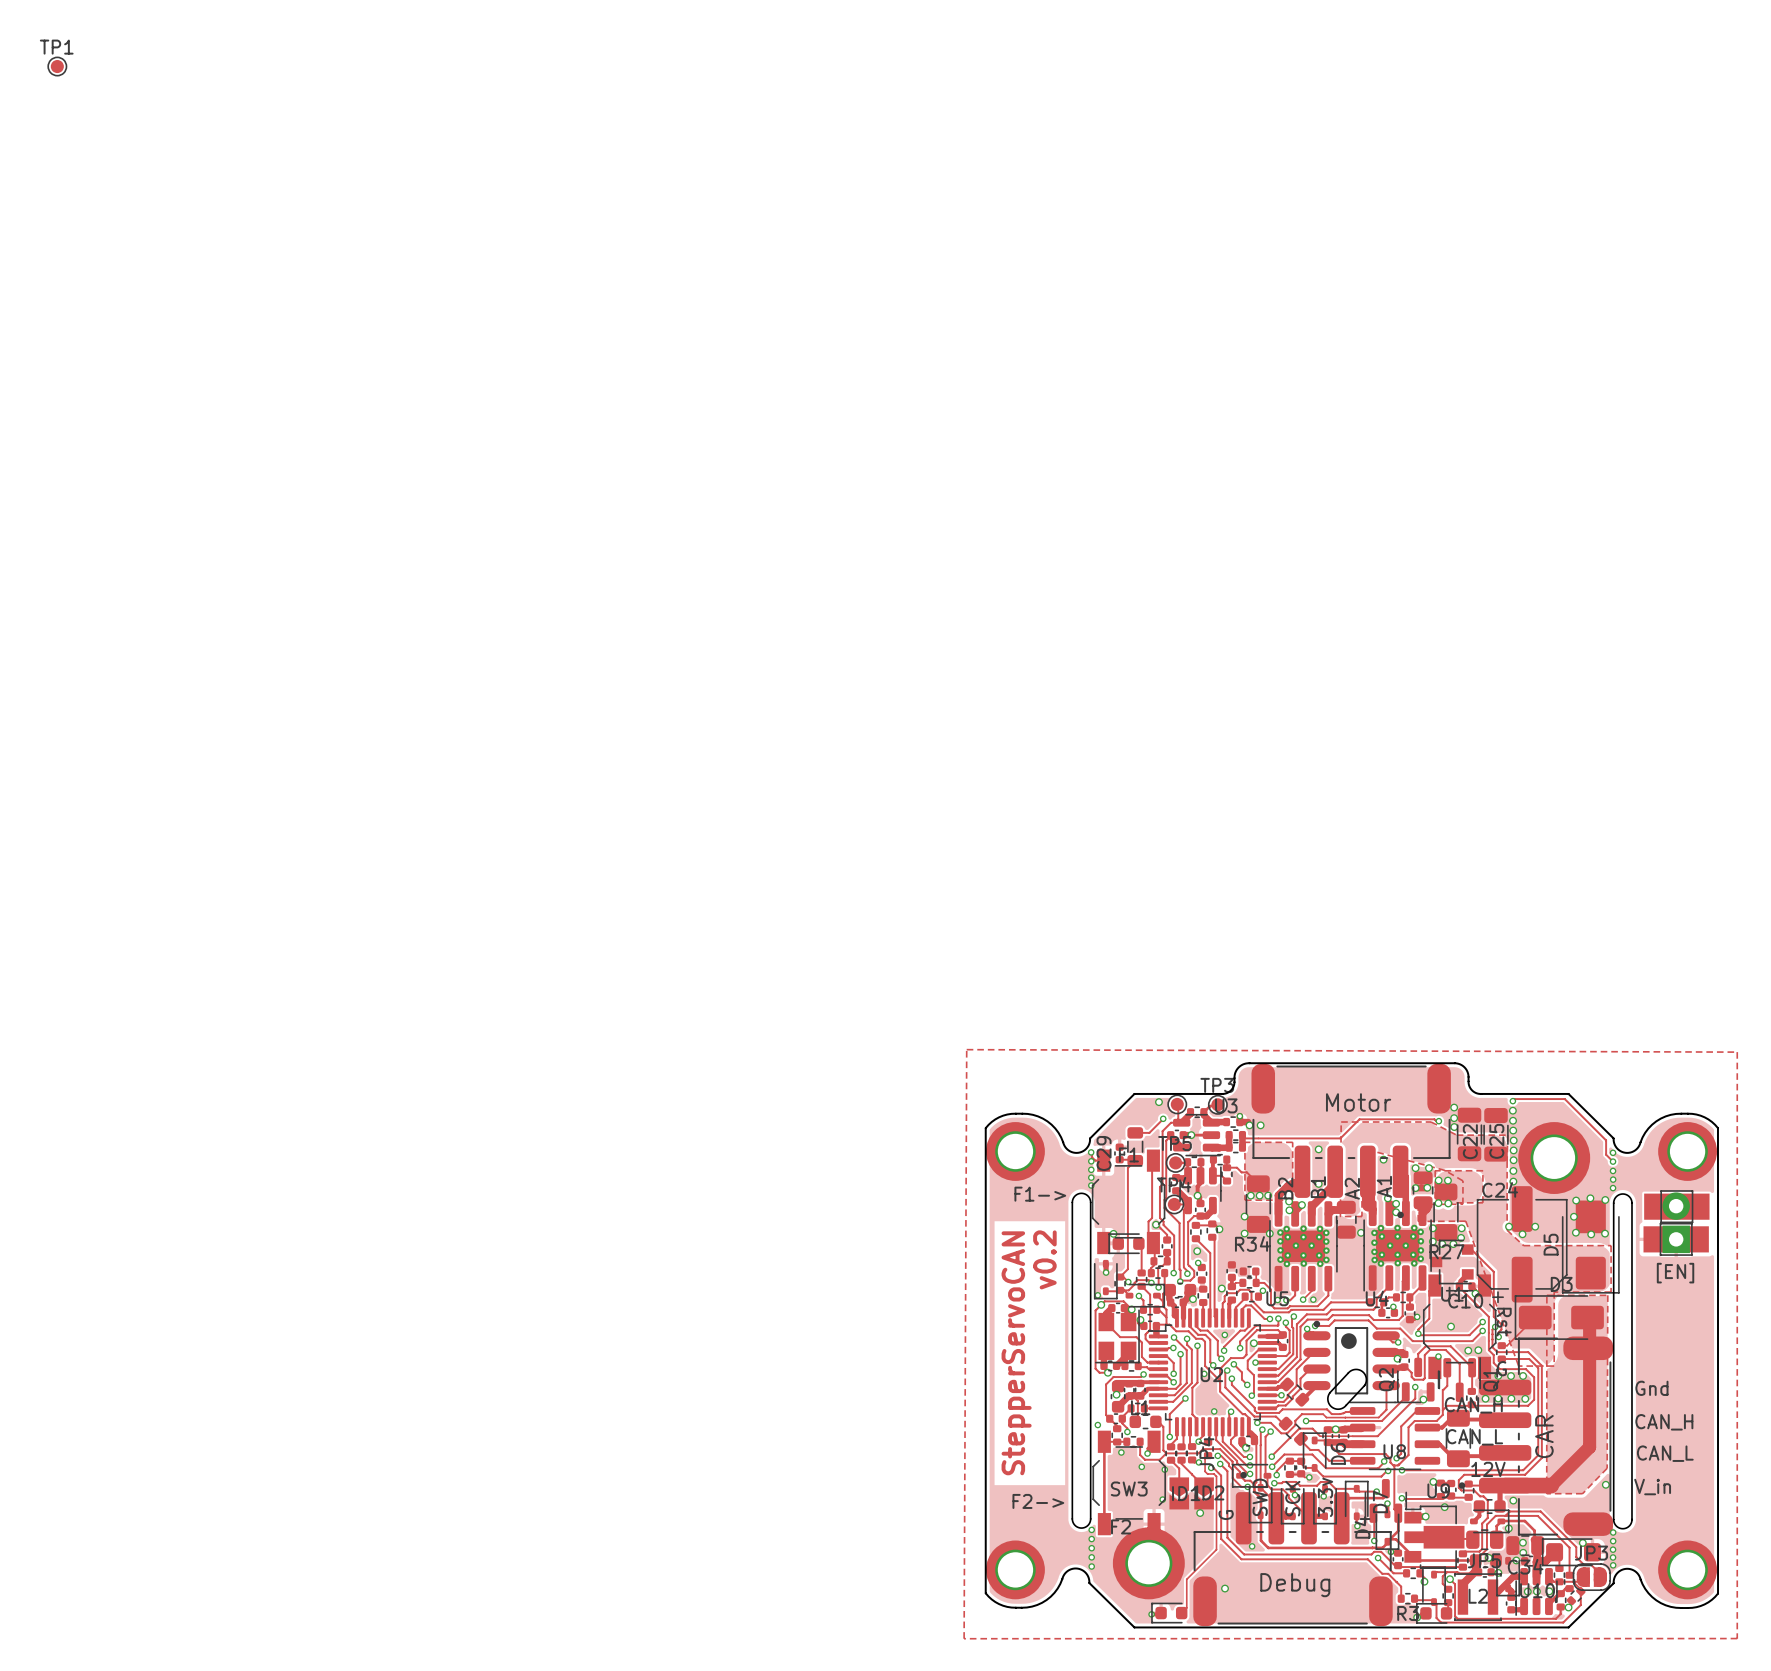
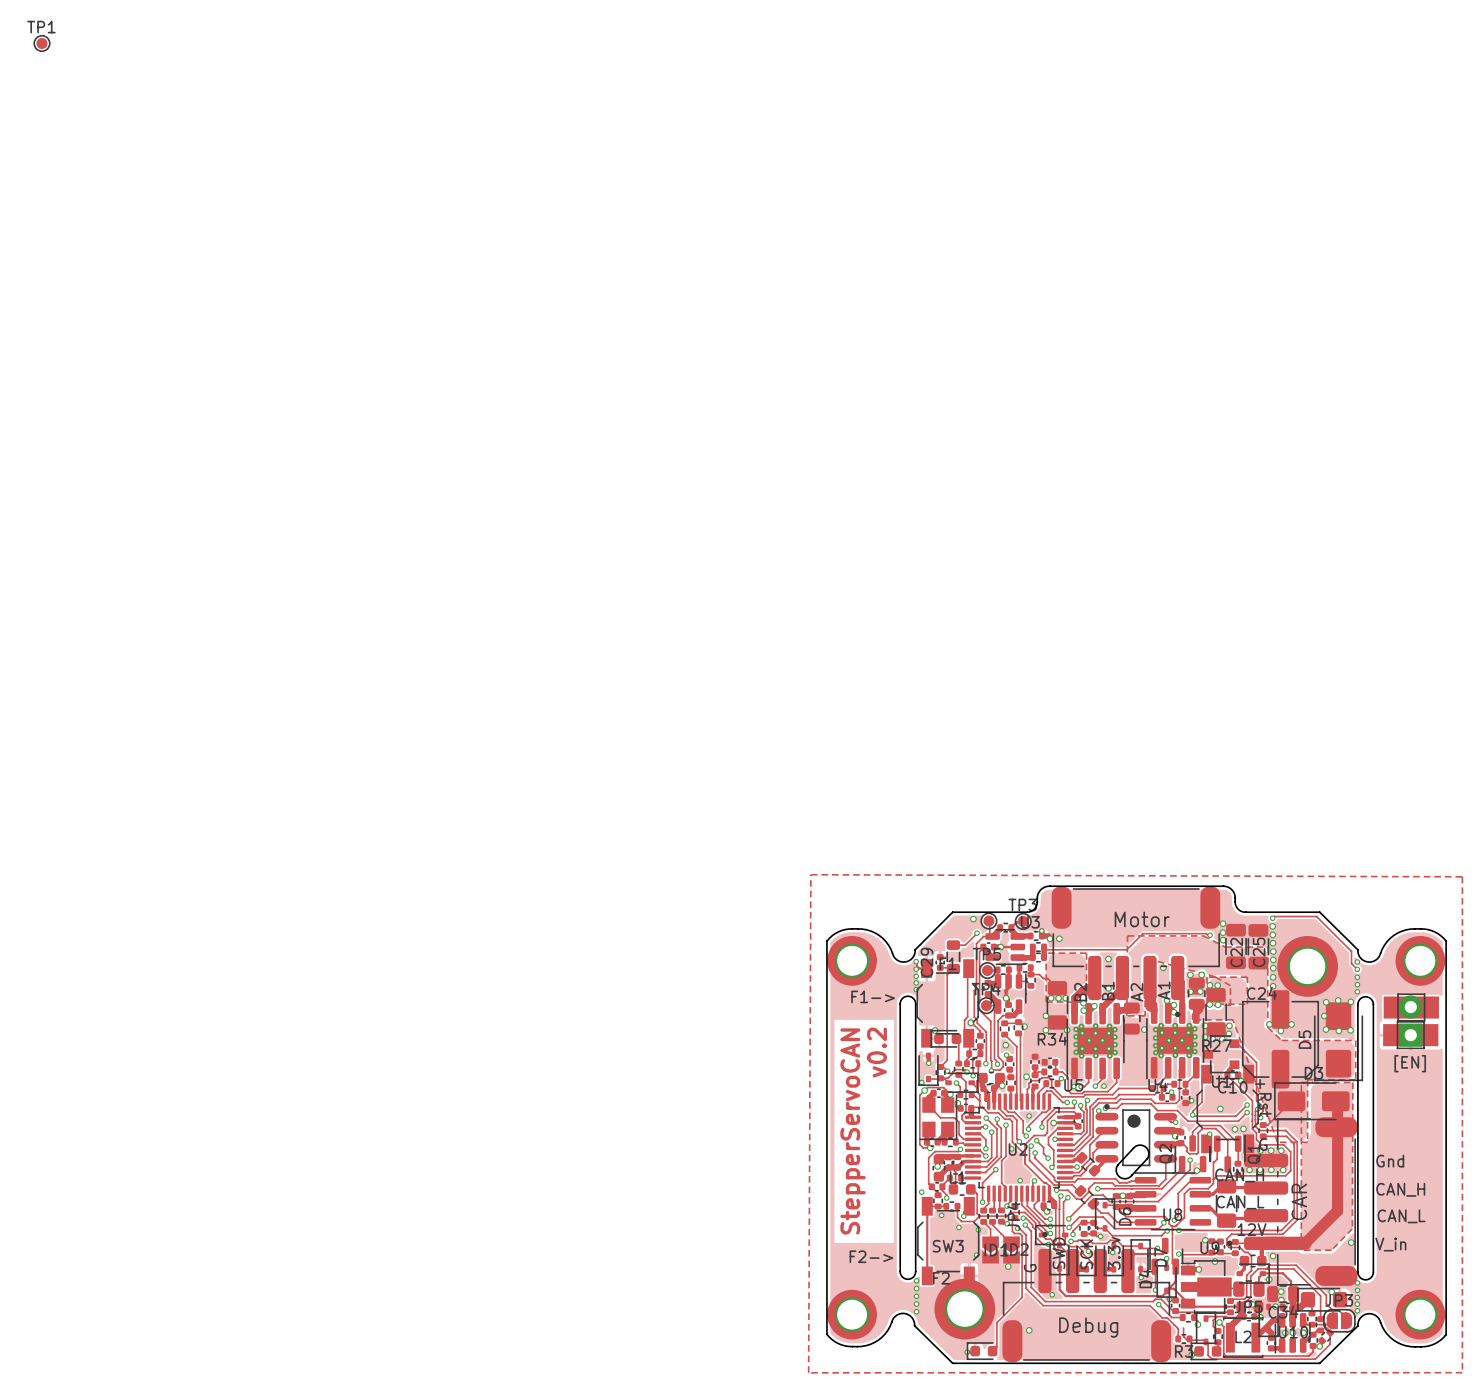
track: none -> (1183, 1328) (1183, 1336) (1188, 1341)

